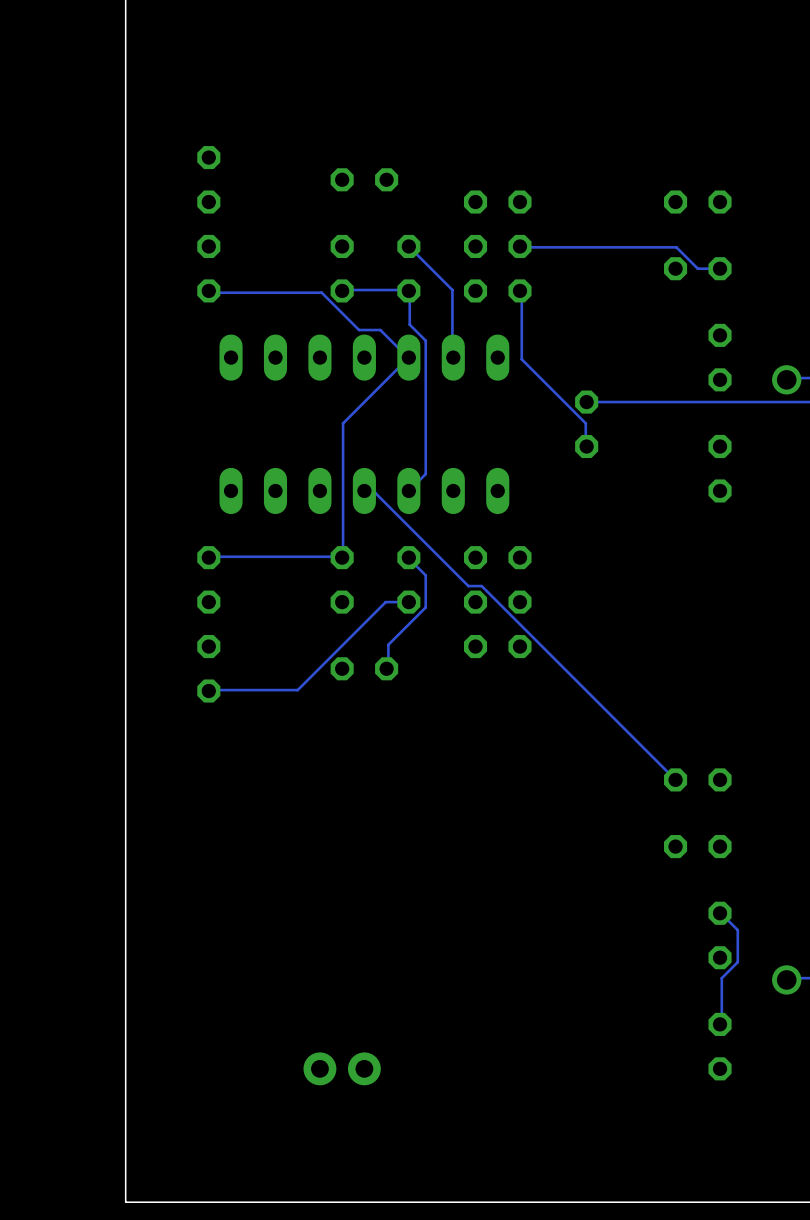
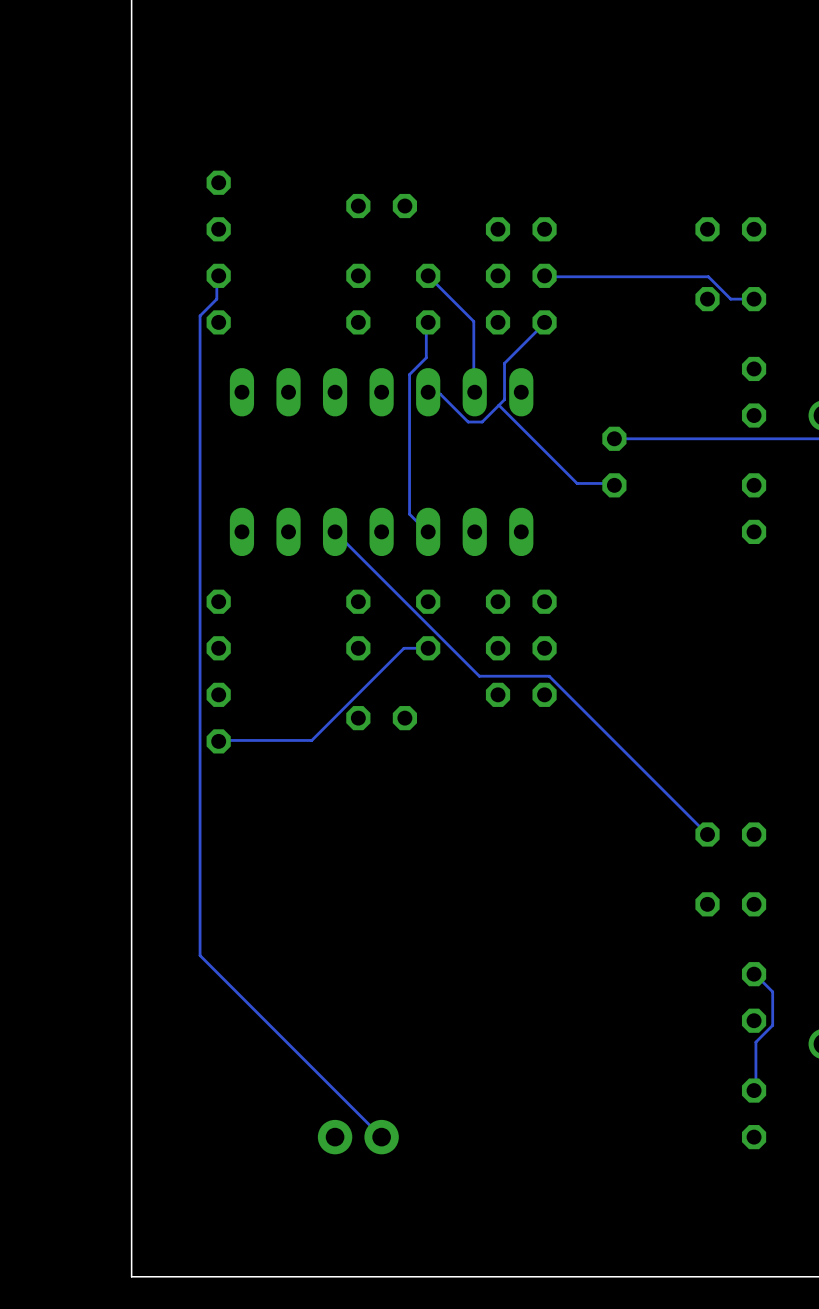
track: none -> (218, 275) (216, 276) (216, 299) (200, 315) (200, 955) (381, 1137)
track: (208, 290) (209, 292) (321, 292) (359, 330) (380, 330) (408, 357) (343, 423) (342, 557) (208, 557) -> none
track: (342, 290) (407, 290) (409, 292) (409, 324) (425, 340) (425, 474) (408, 490) -> (428, 322) (426, 324) (426, 357) (409, 374) (409, 514) (428, 531)
track: (519, 290) (521, 292) (521, 359) (585, 423) (585, 444) -> (498, 405) (577, 483) (613, 483)
track: none -> (544, 322) (504, 363) (504, 399) (482, 422) (468, 422) (440, 394) (429, 394) (428, 392)
track: (364, 490) (364, 492) (375, 492) (468, 586) (481, 586) (524, 628) -> (335, 531) (479, 676) (549, 676)
track: (408, 557) (425, 575) (425, 607) (388, 644) (388, 668) (386, 668) -> none

